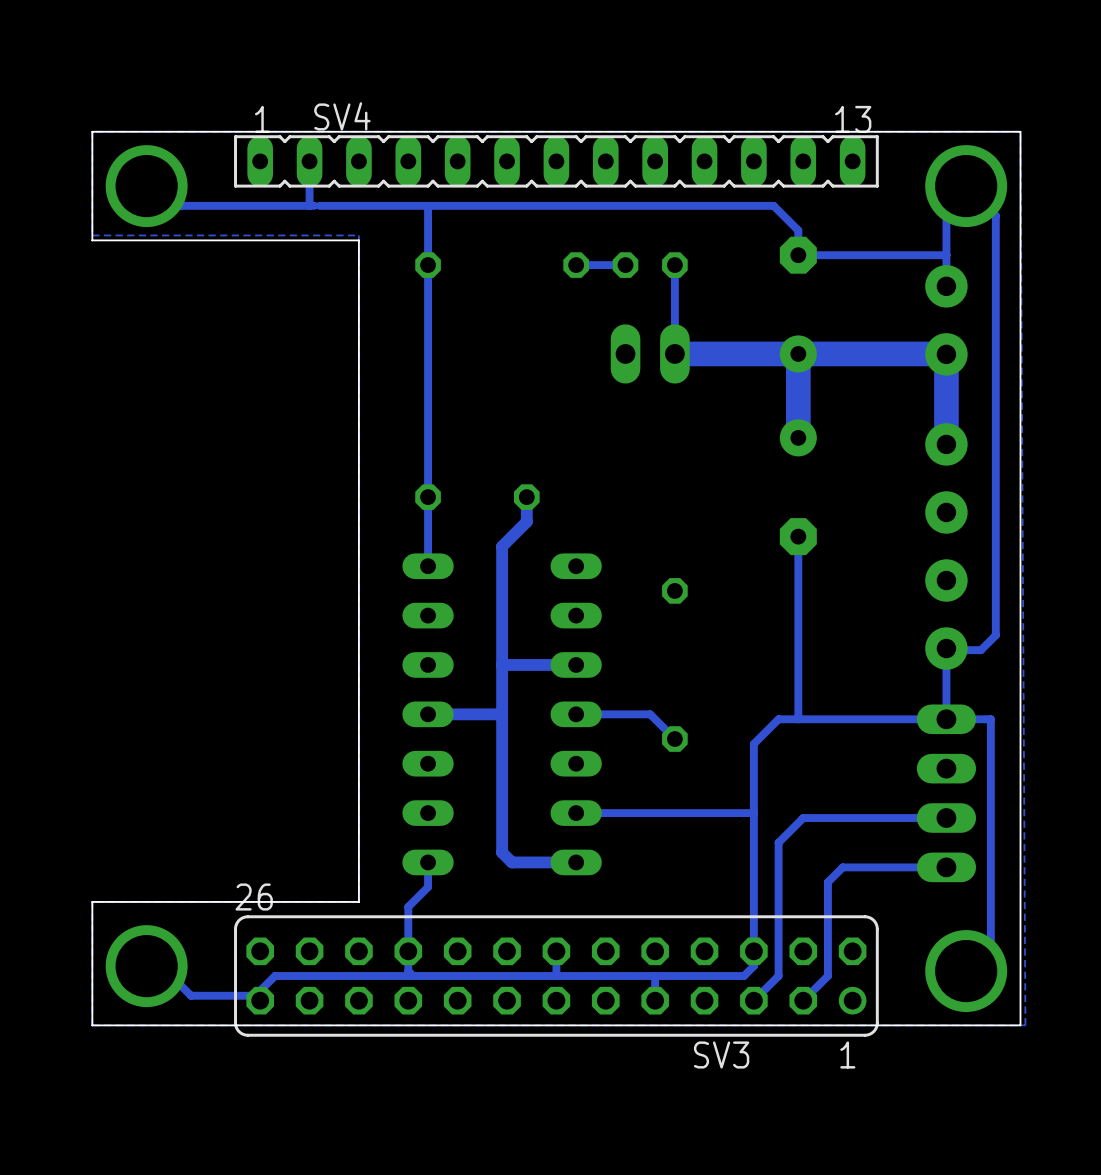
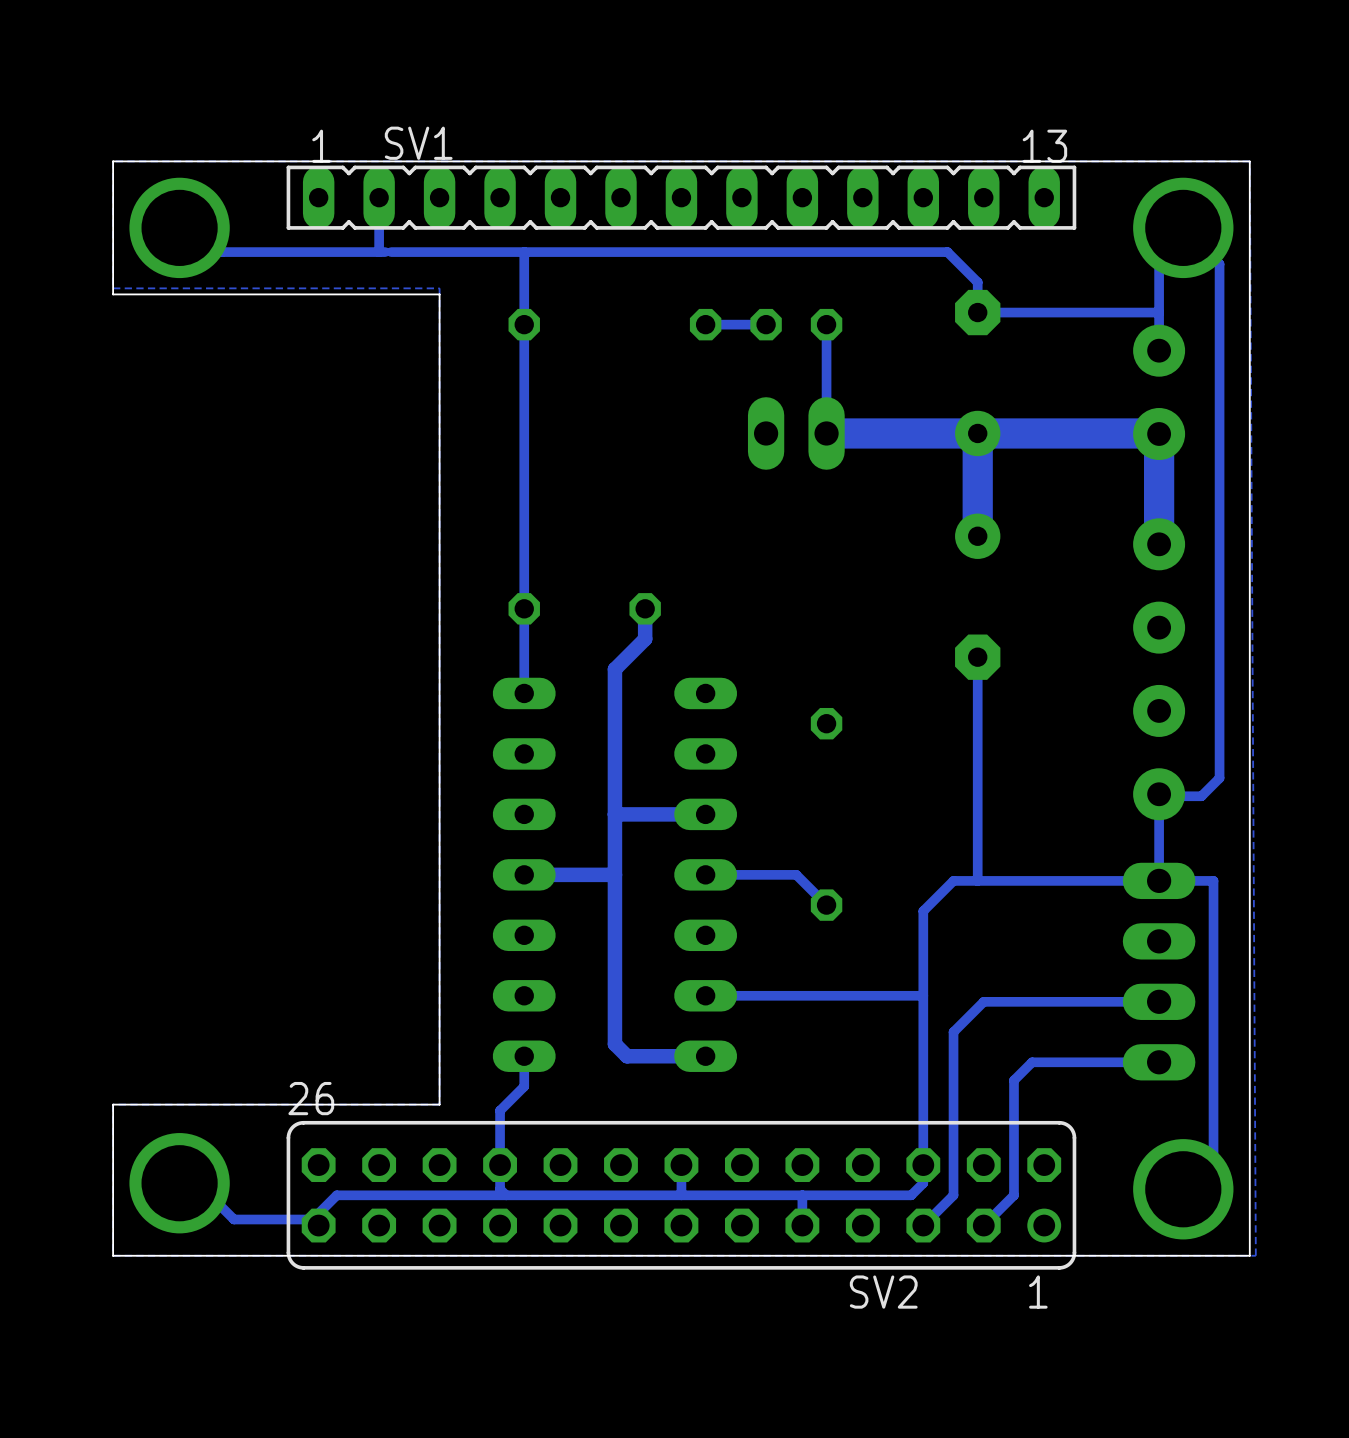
SV4 name: SV4 (342, 116) -> SV1 (418, 143)
SV3 name: SV3 (721, 1054) -> SV2 (883, 1292)

